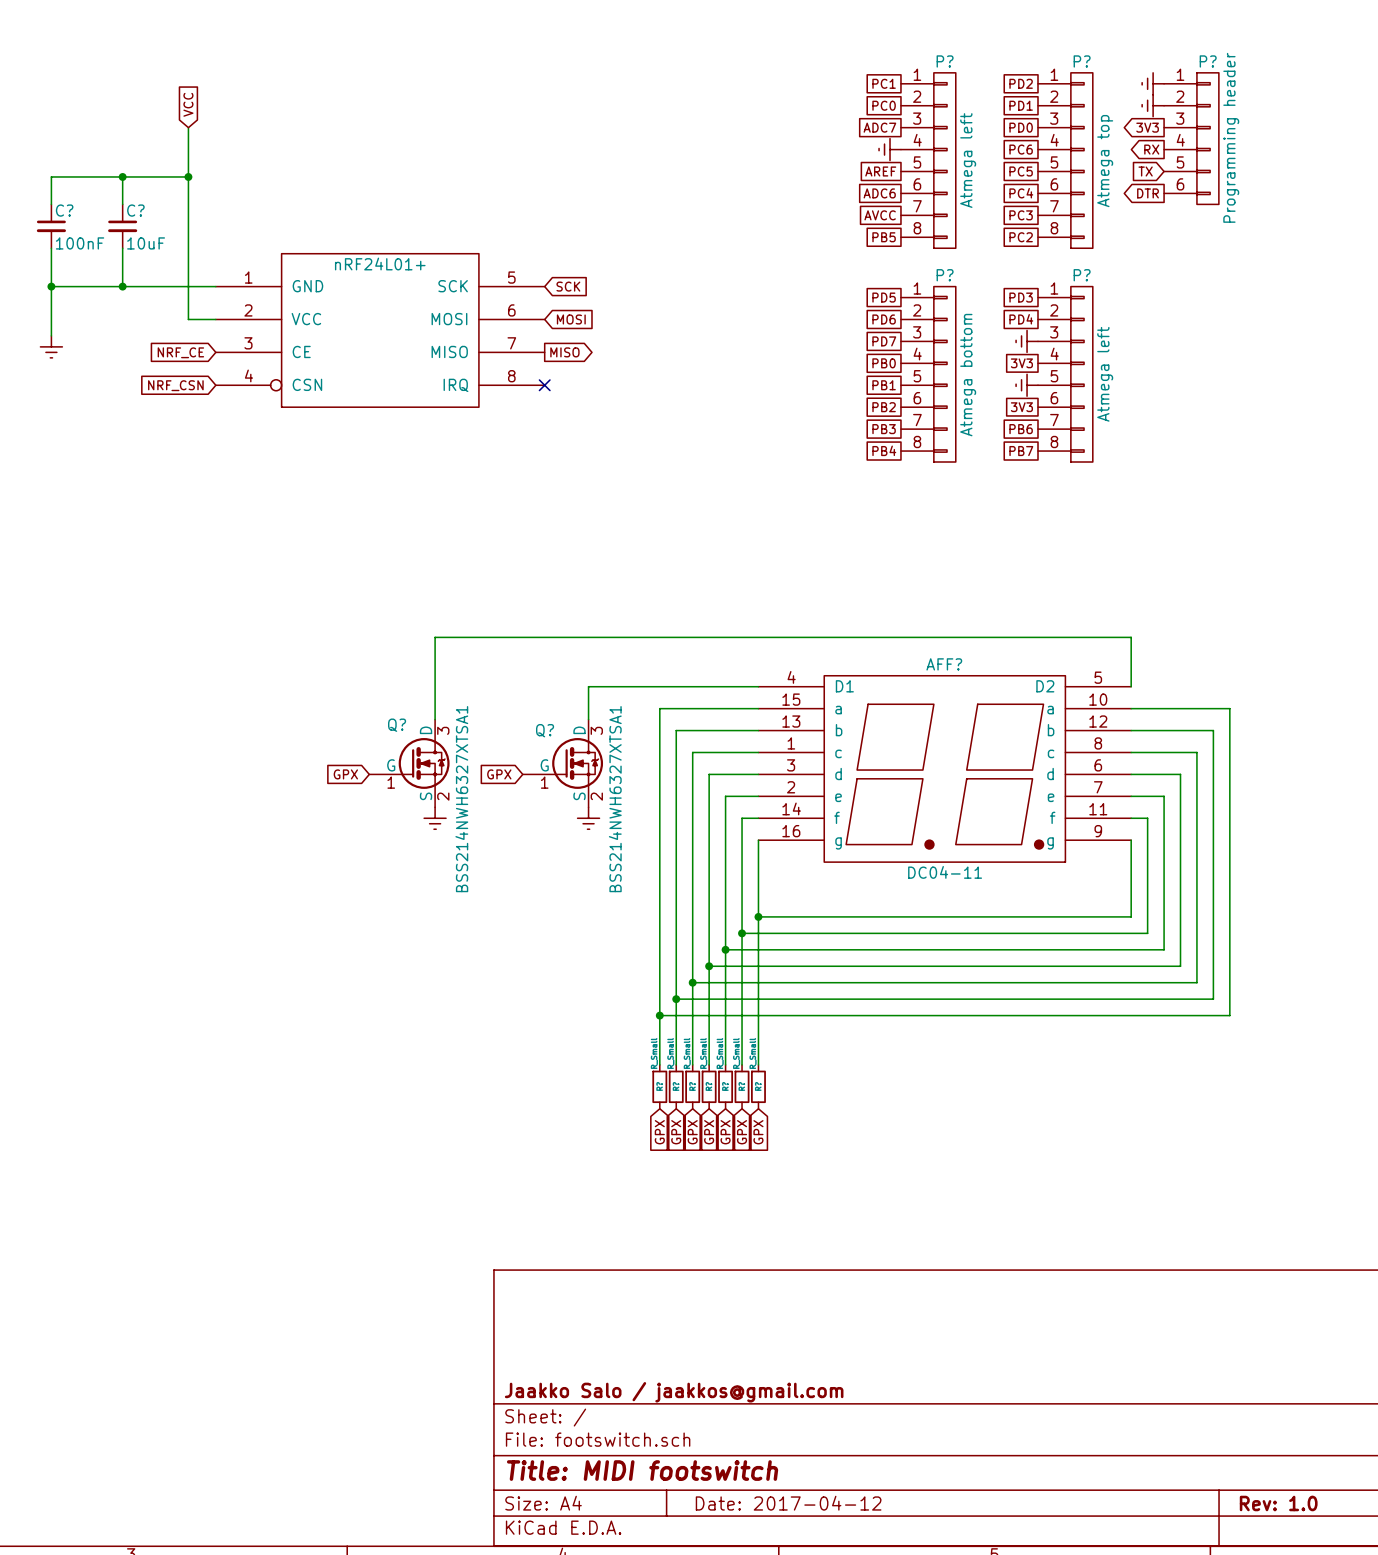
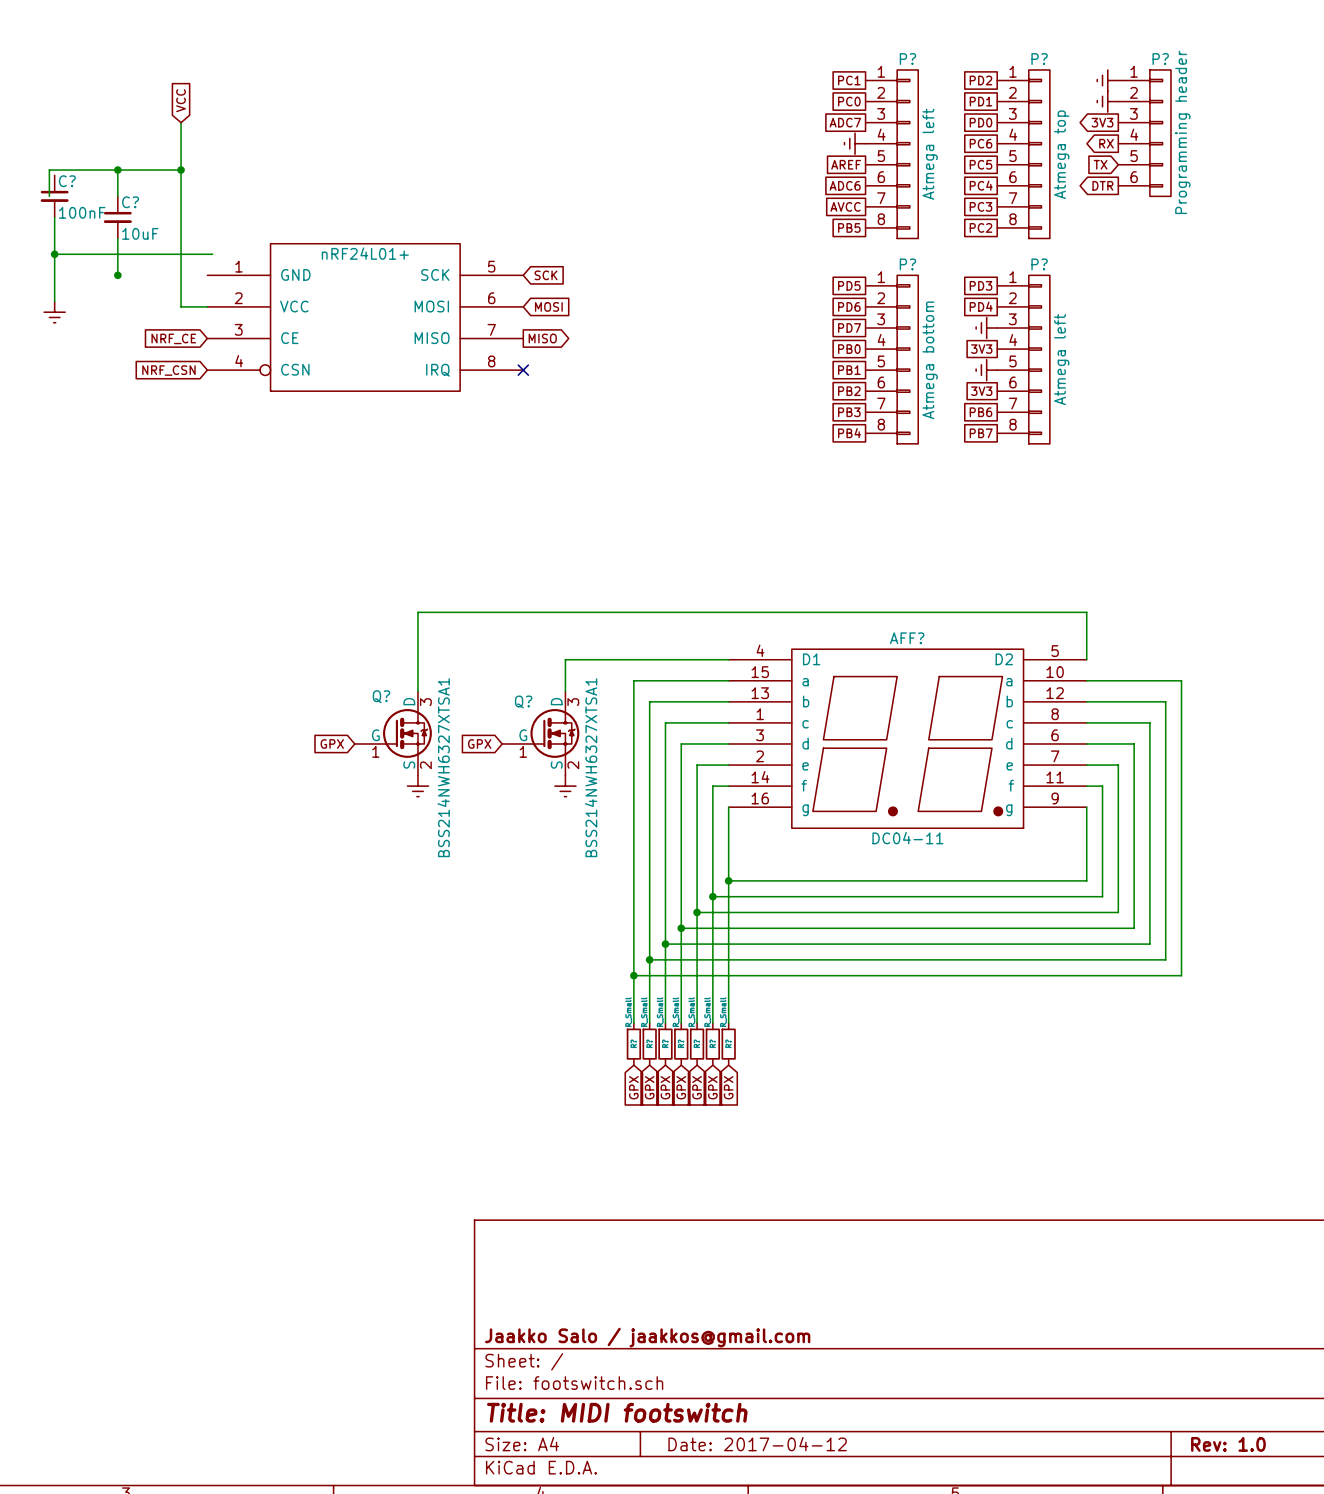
C? position: (51, 226) -> (54, 196)
wire: (51, 248) (51, 335) -> (54, 217) (54, 301)
wire: (51, 286) (215, 286) -> (54, 254) (212, 254)
junction position: (51, 286) -> (54, 254)
power symbol position: (51, 346) -> (54, 312)

